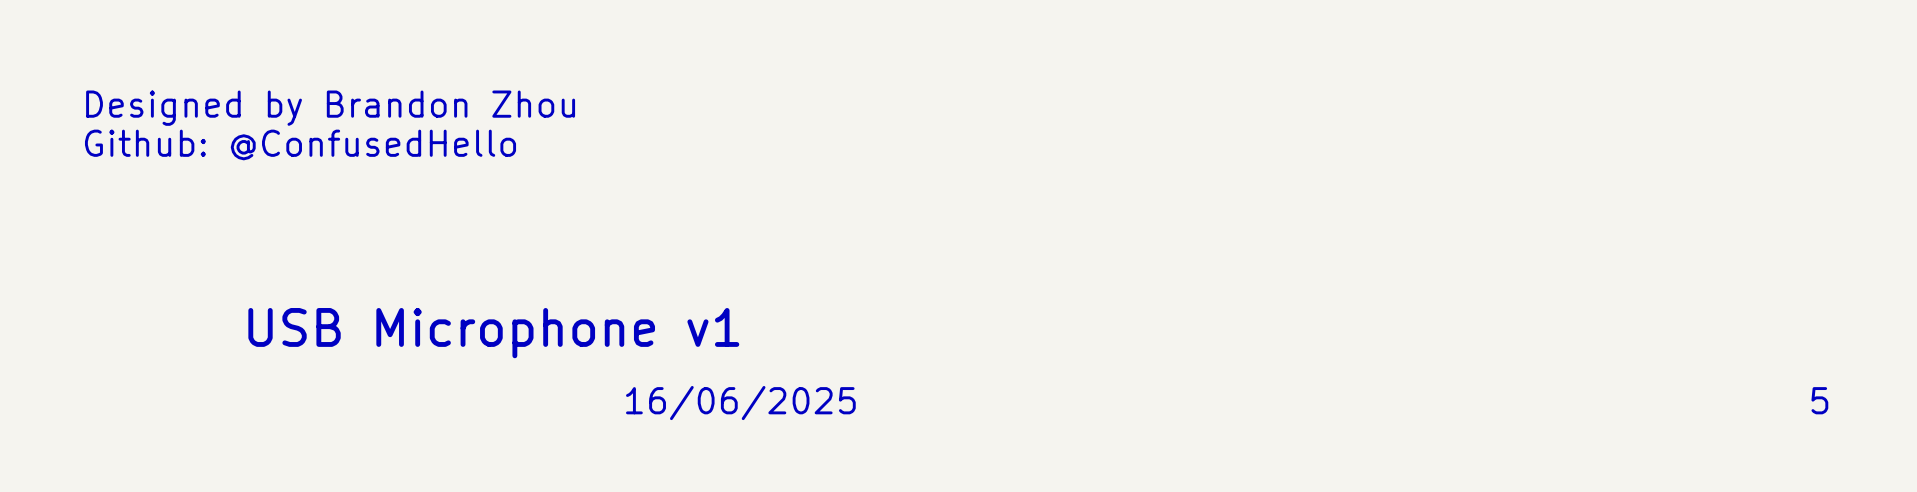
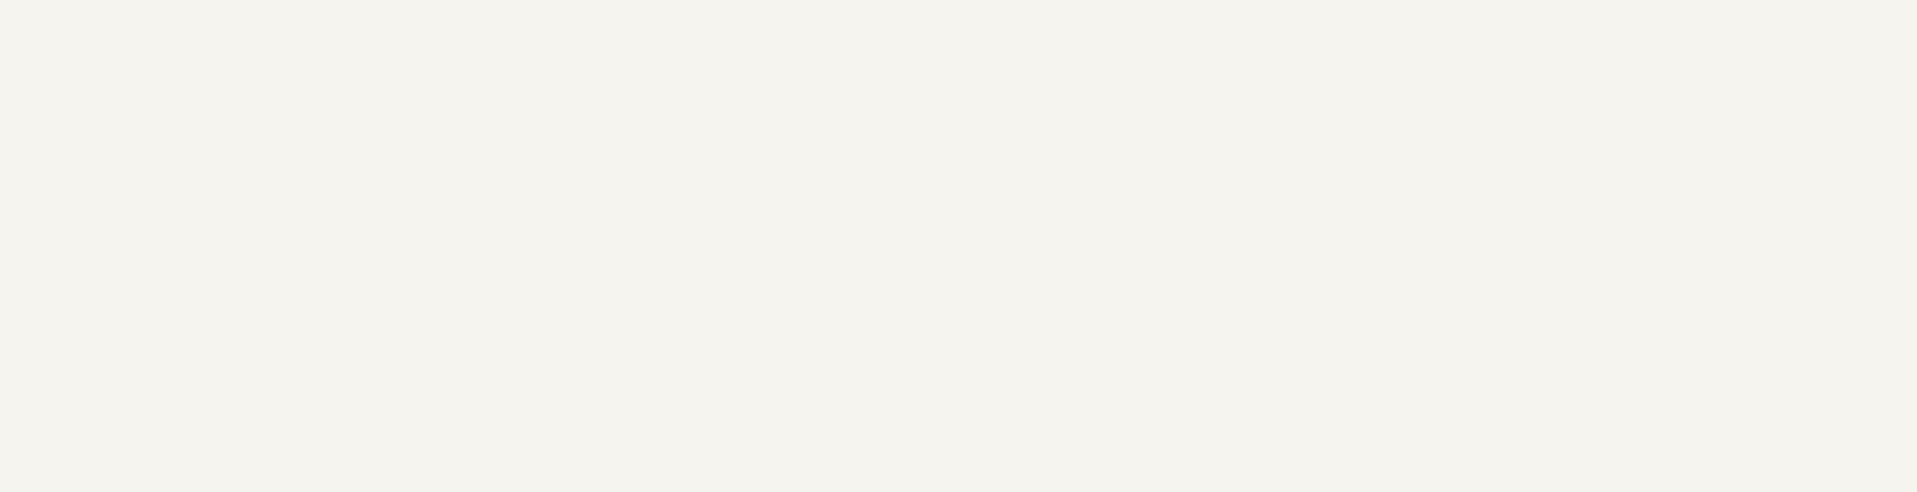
text: Designed by Brandon Zhou (330, 108) -> none
text: Github: @ConfusedHello (300, 144) -> none
text: USB Microphone v1 (493, 333) -> none
text: 5 (1819, 400) -> none
text: 16/06/2025 (740, 403) -> none

